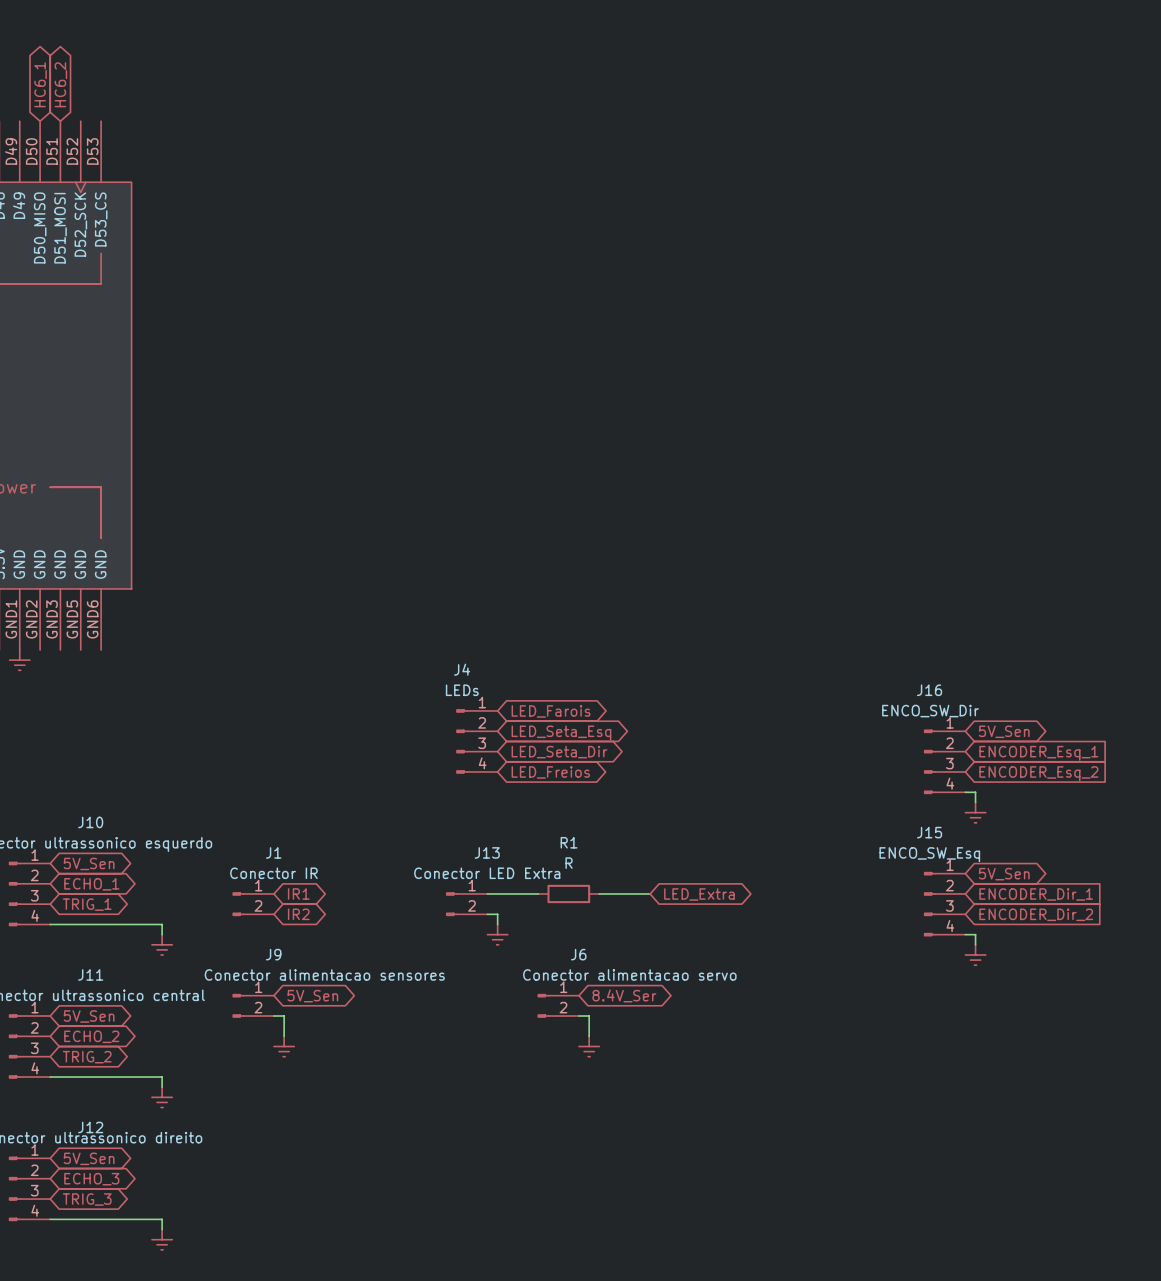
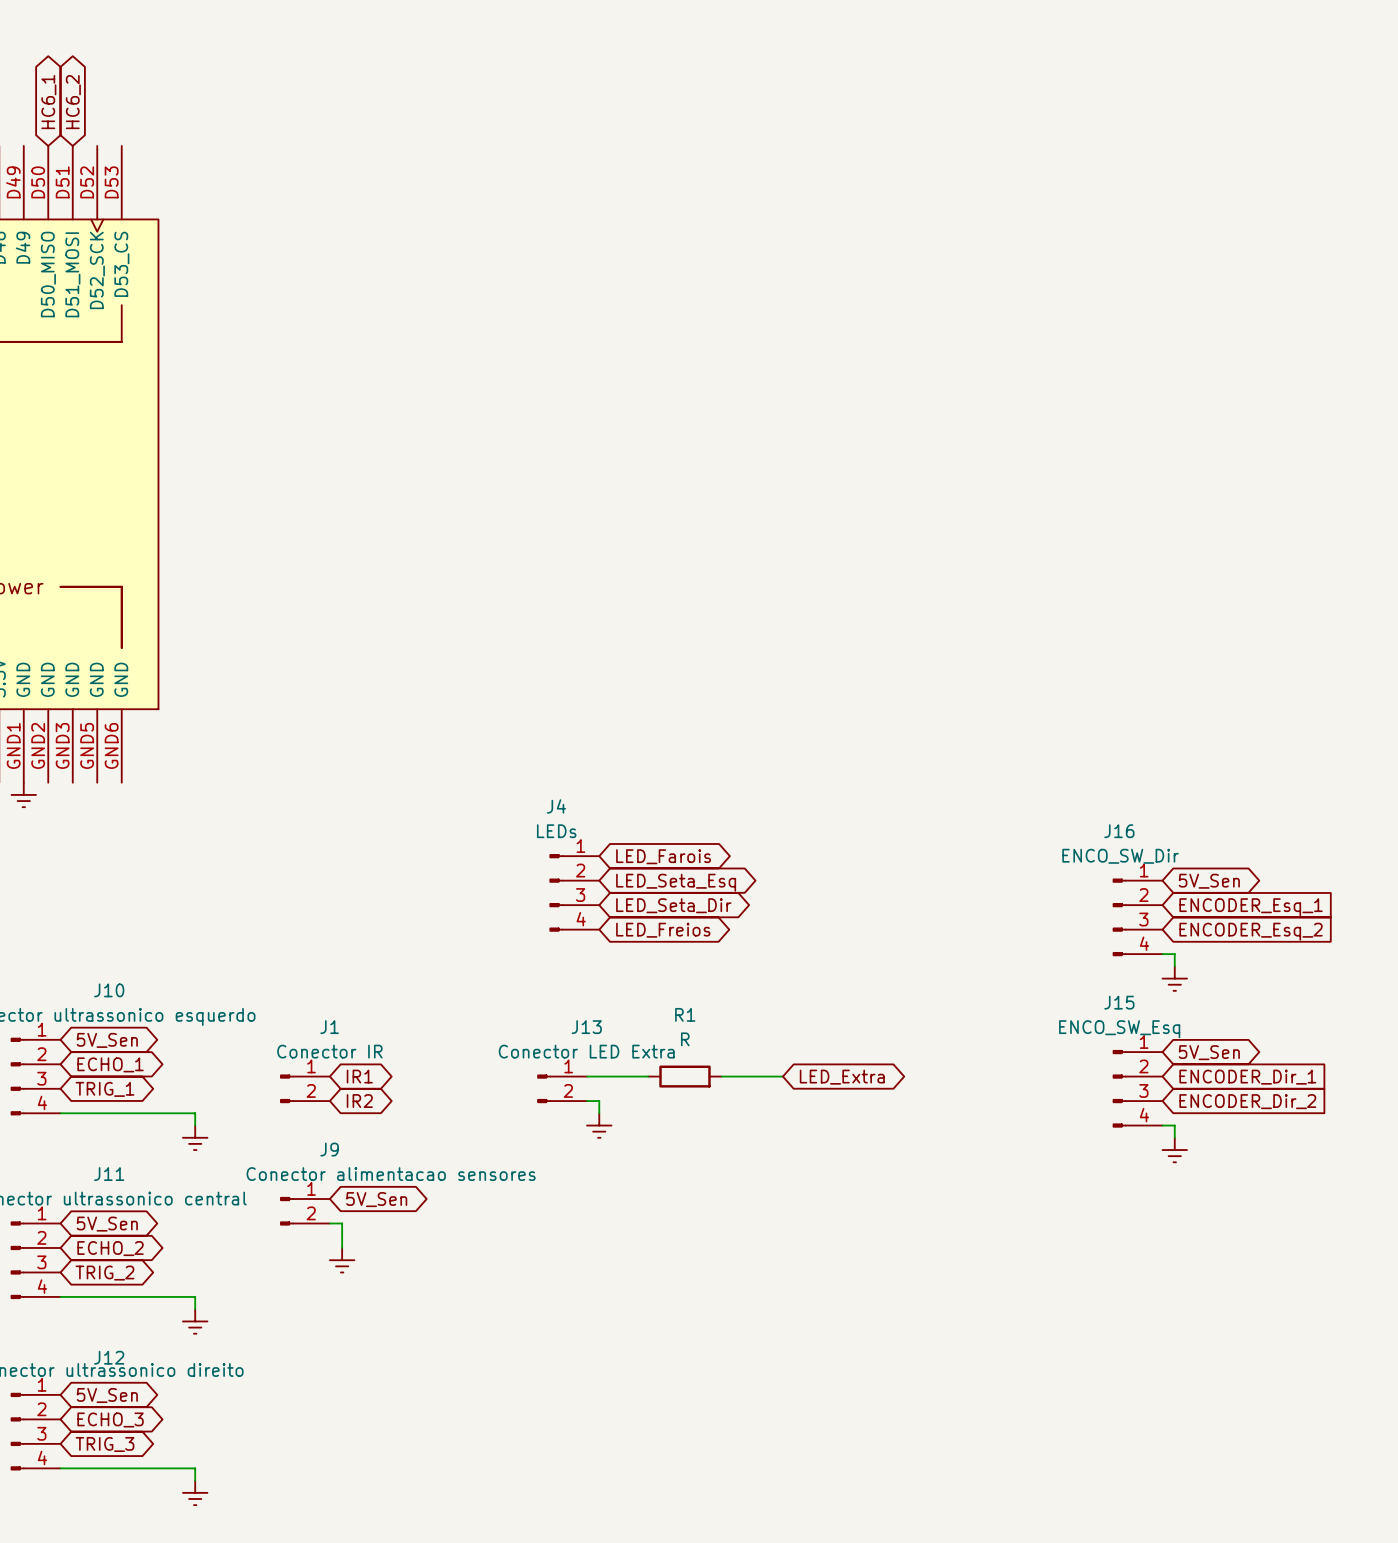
global label: 8.4V_Ser (624, 995) -> none
J6: Conector alimentacao servo (558, 1005) -> none
wire: (578, 1016) (589, 1016) (589, 1036) -> none
power symbol: (589, 1046) -> none

